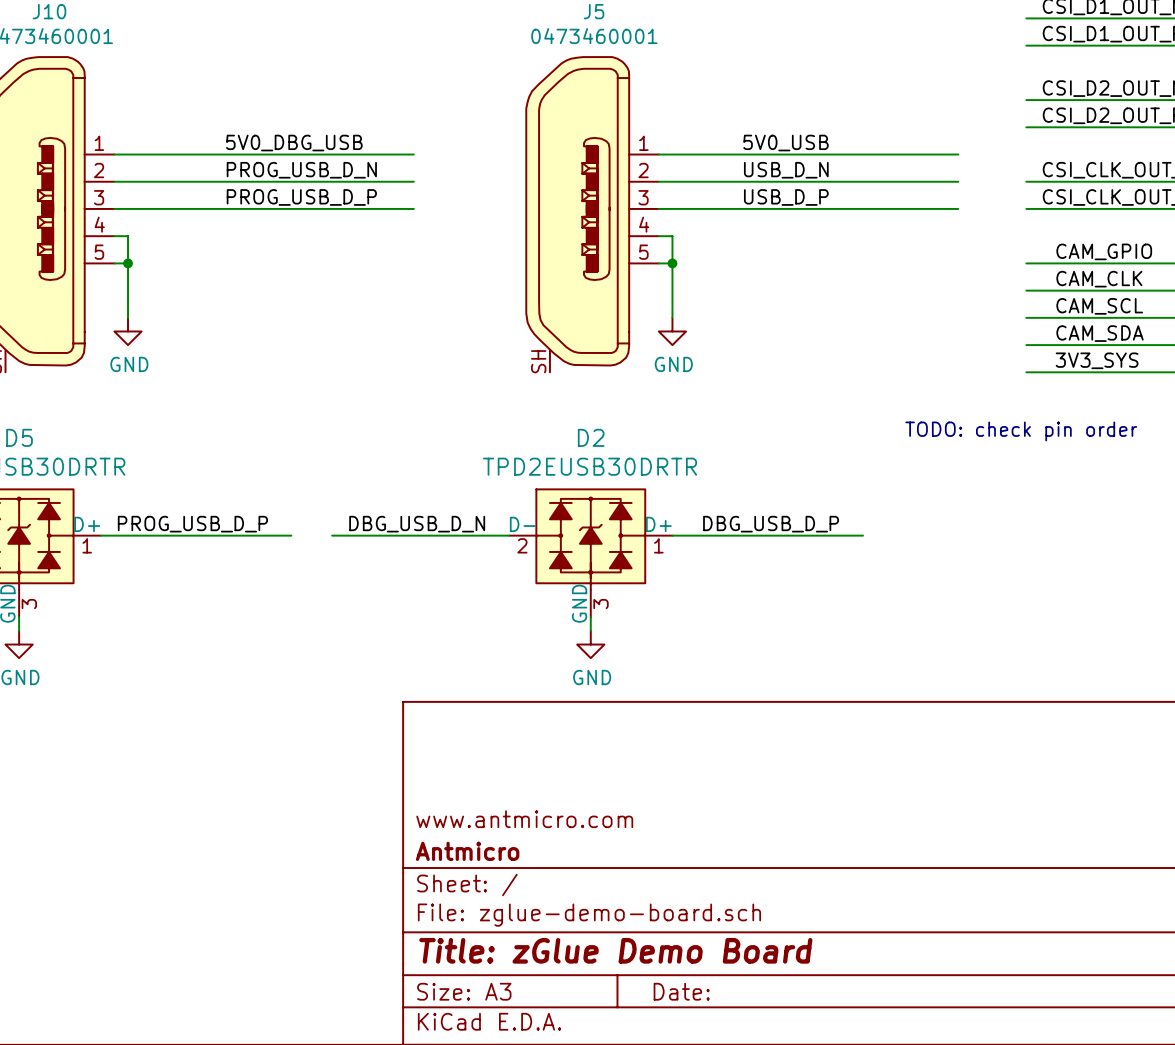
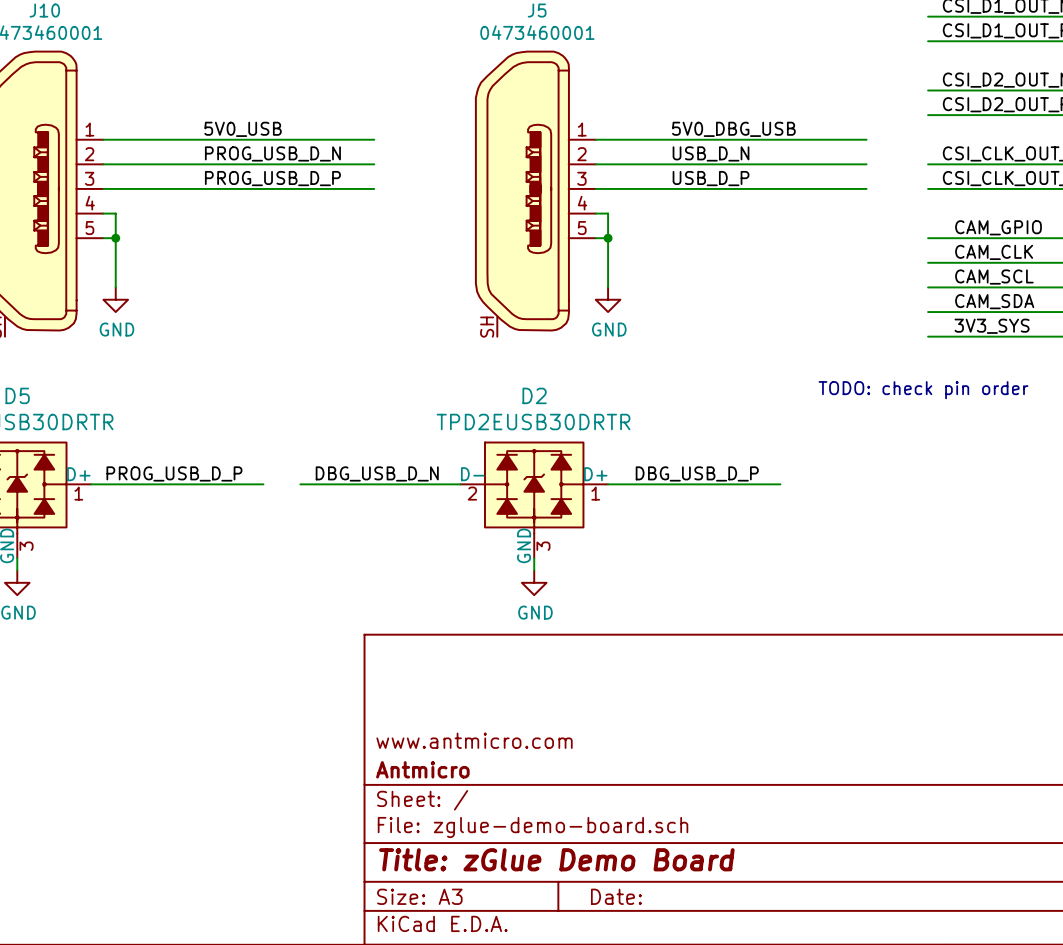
label: 5V0_DBG_USB (294, 143) -> 5V0_USB (243, 129)
label: 5V0_USB (785, 143) -> 5V0_DBG_USB (733, 129)

